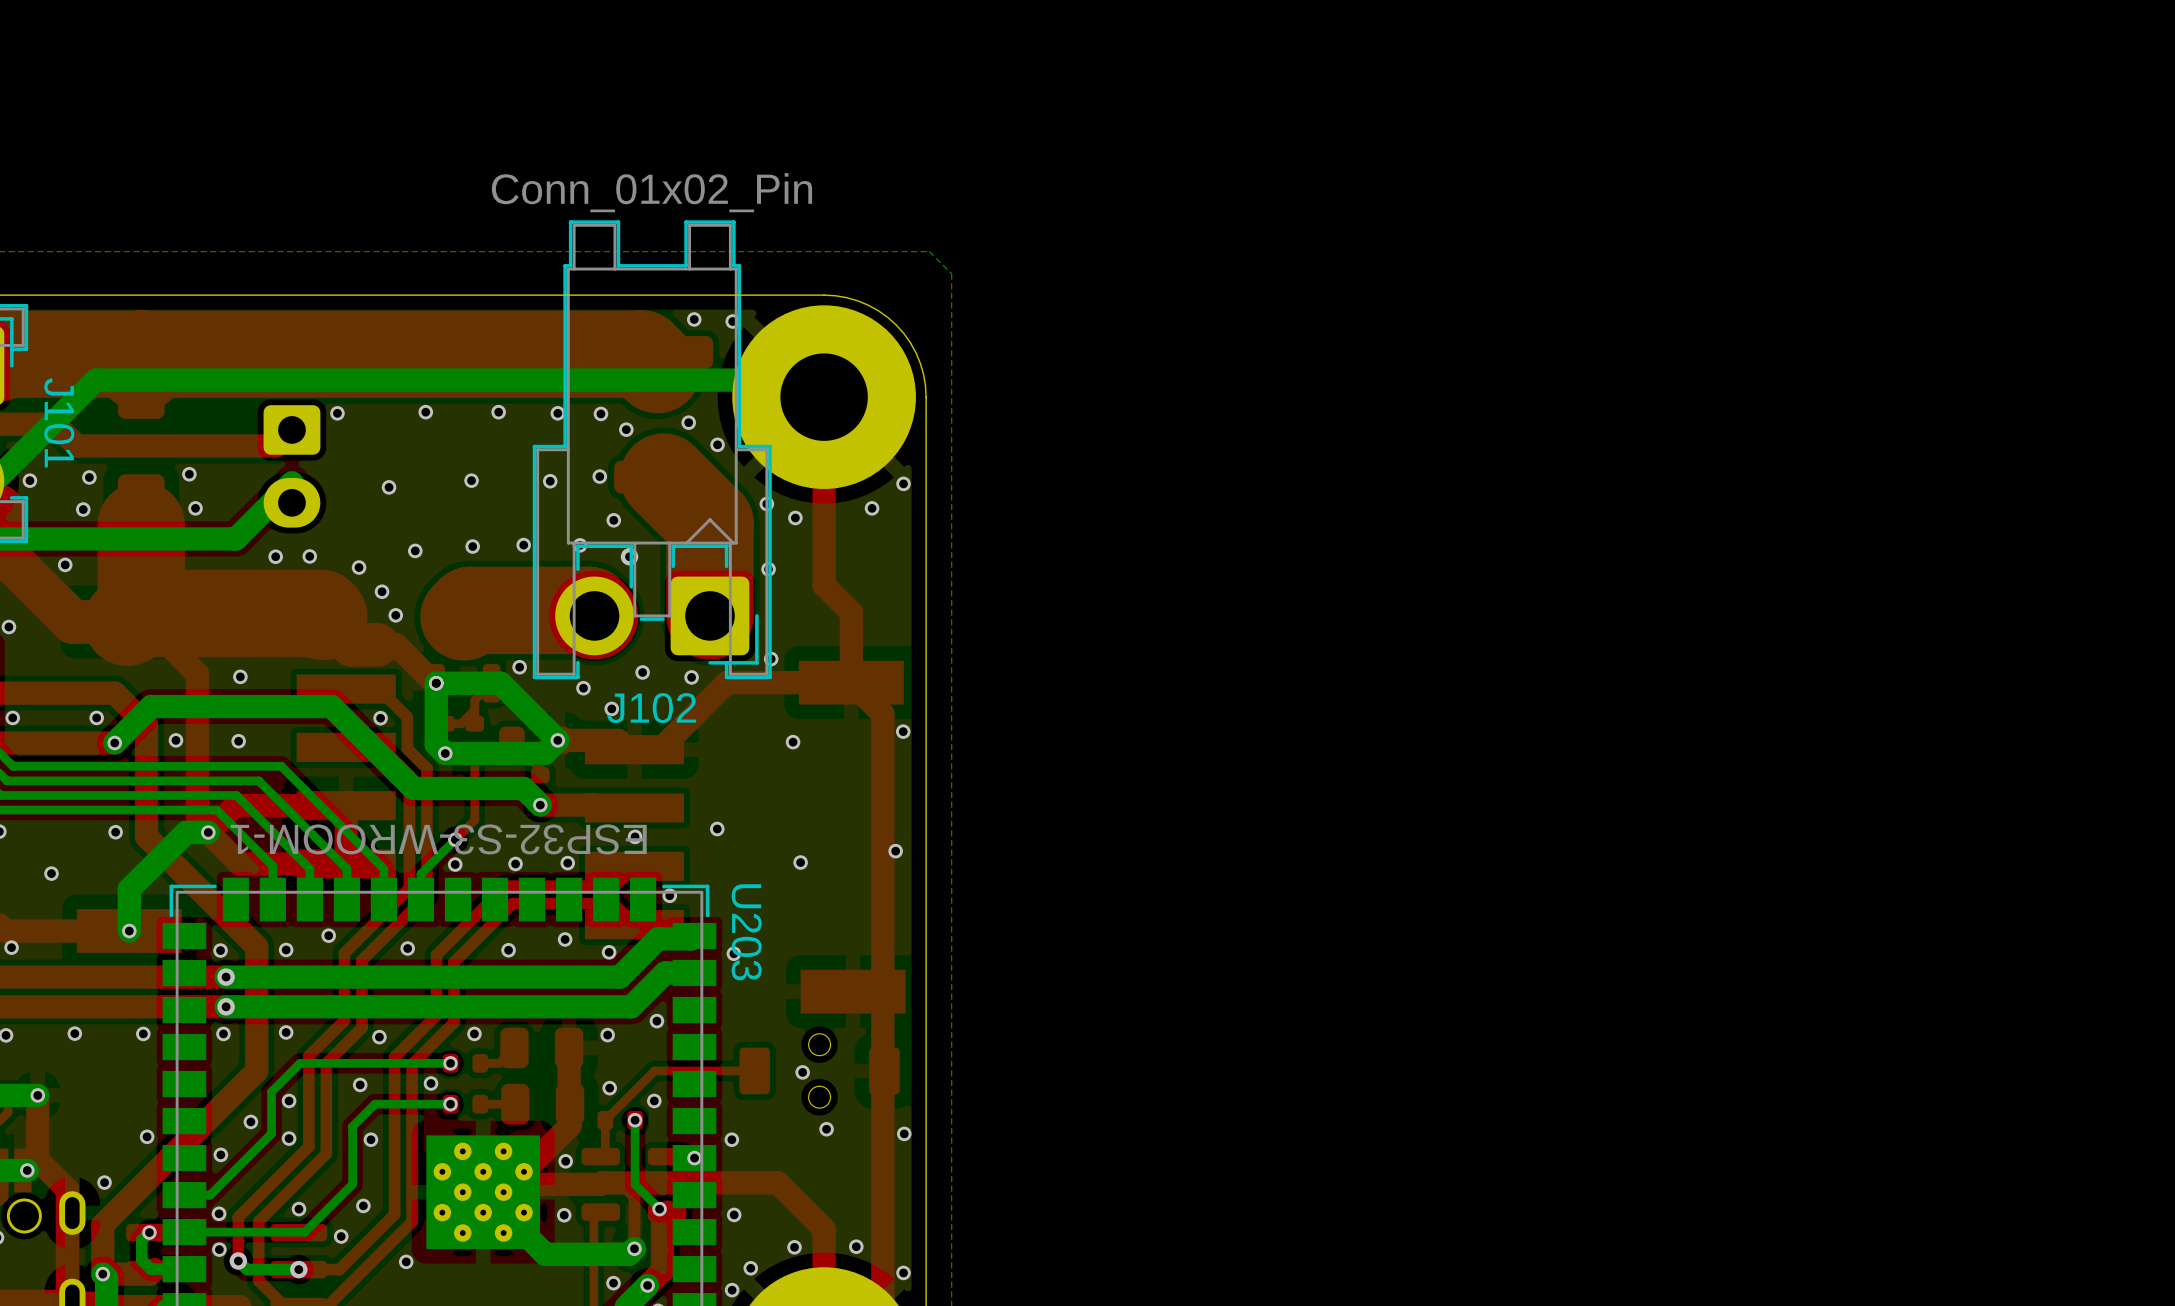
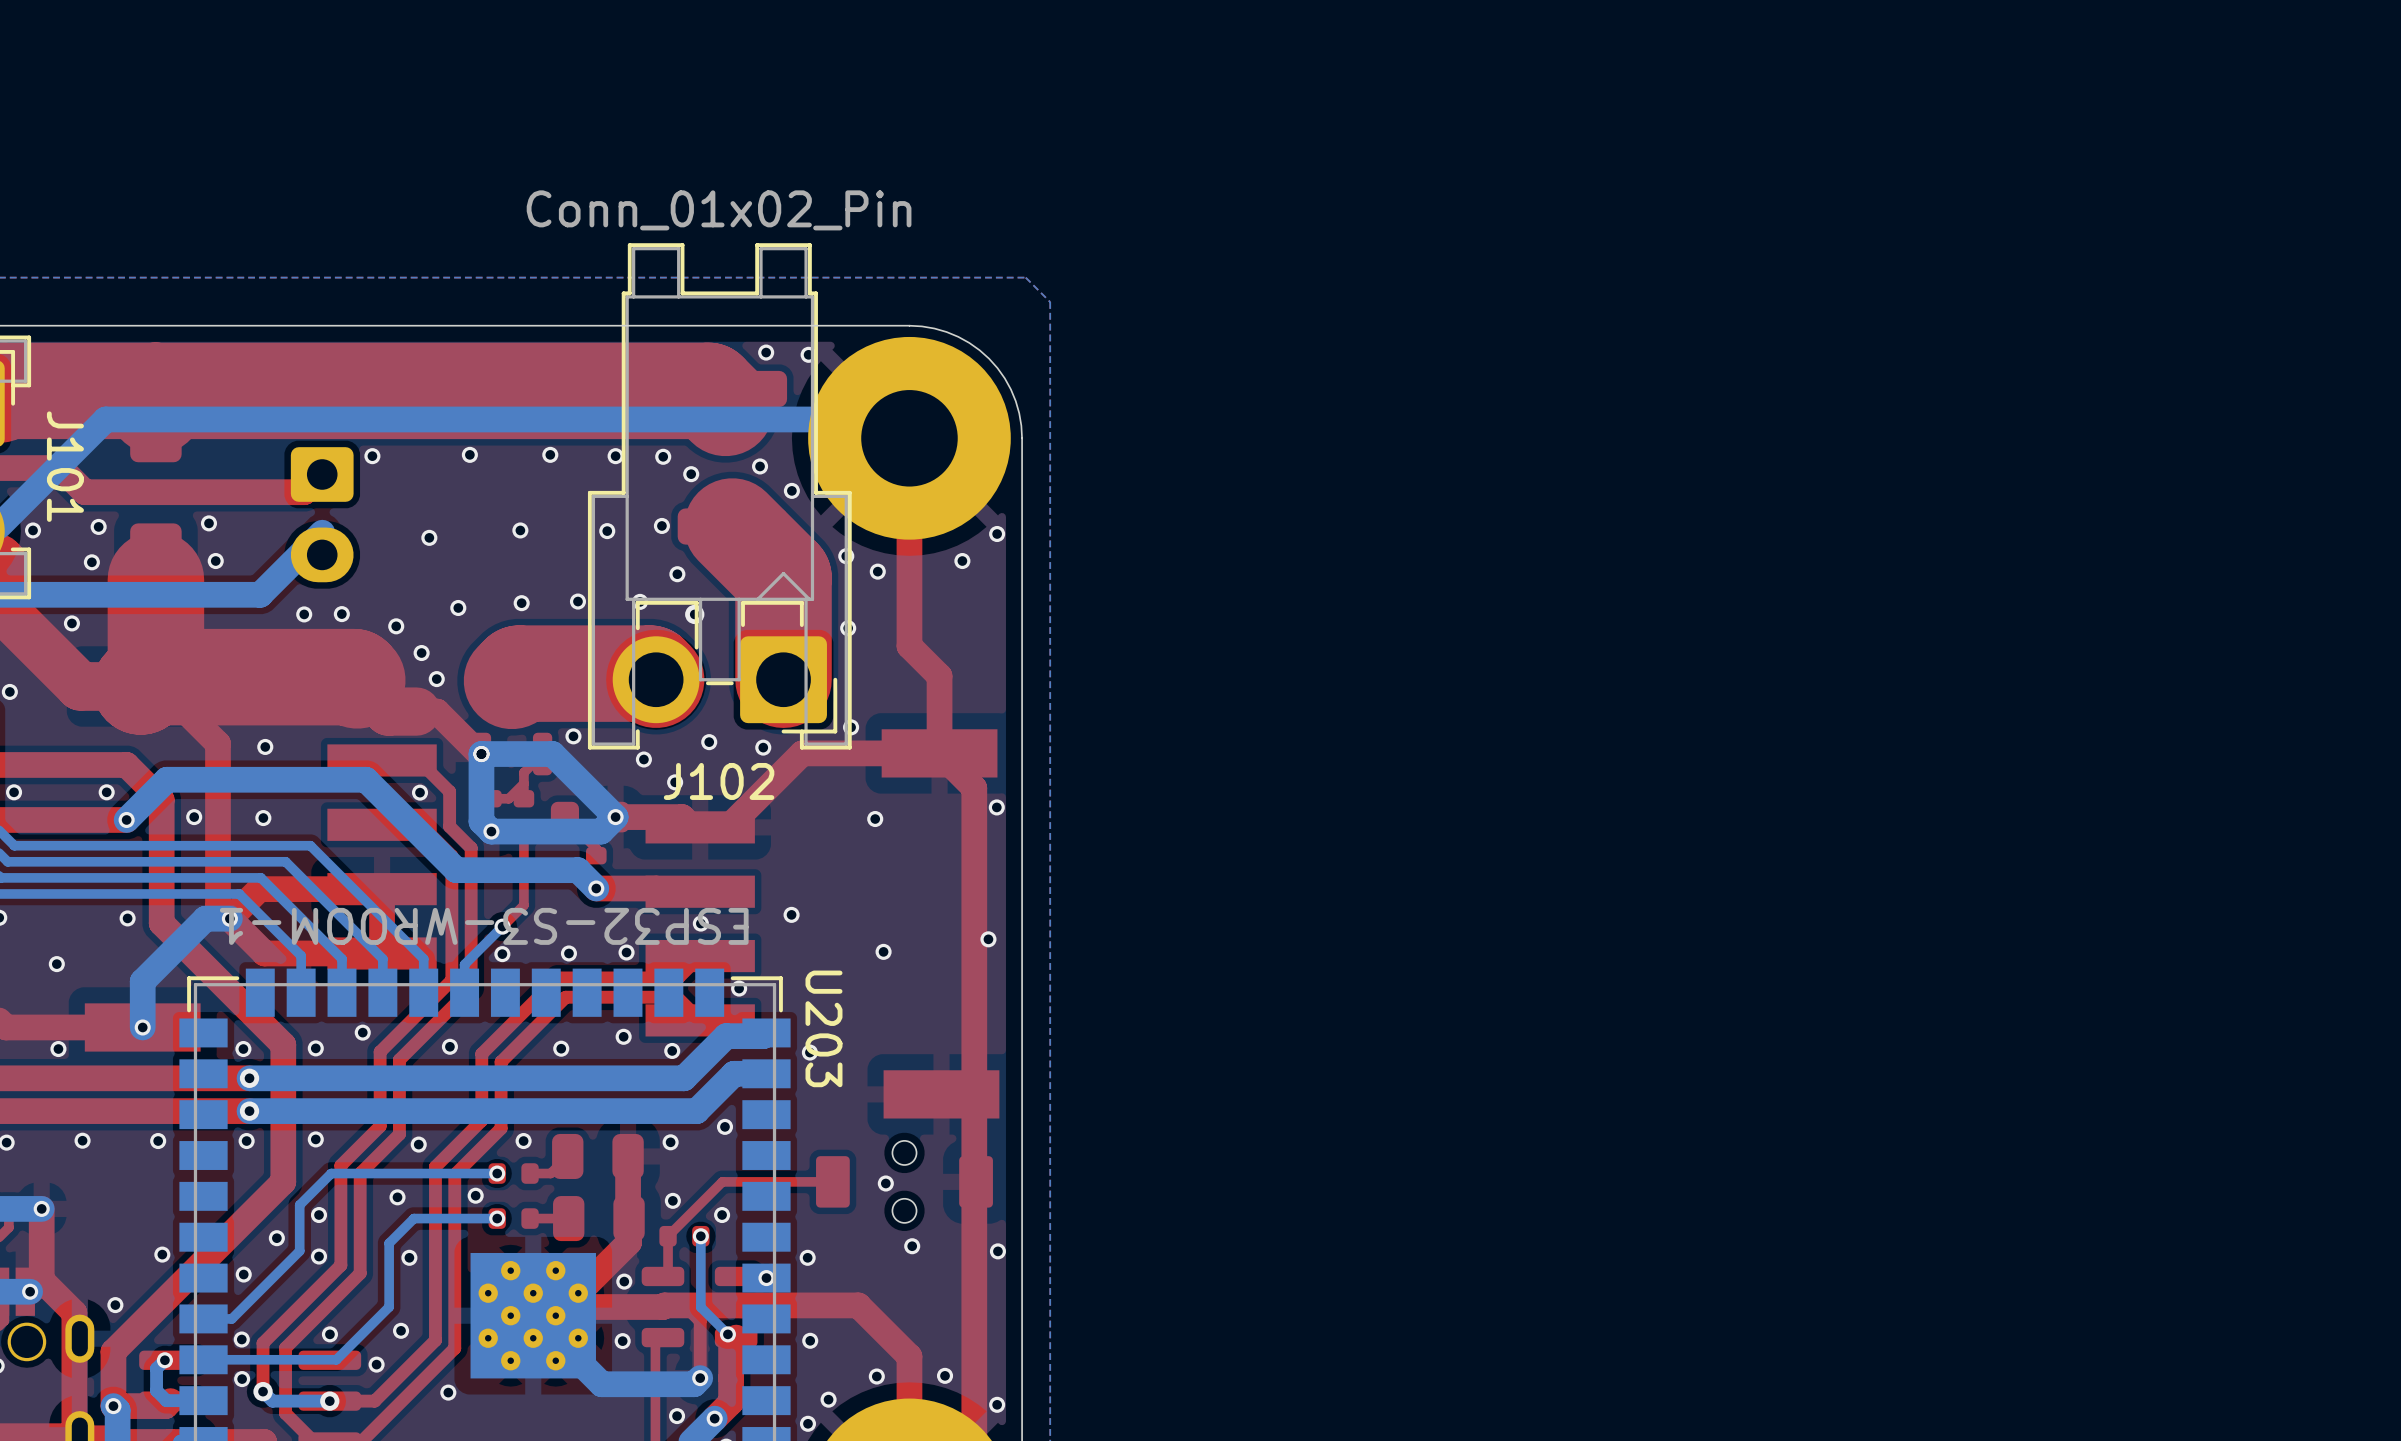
via position: (11, 947) -> (58, 1049)

